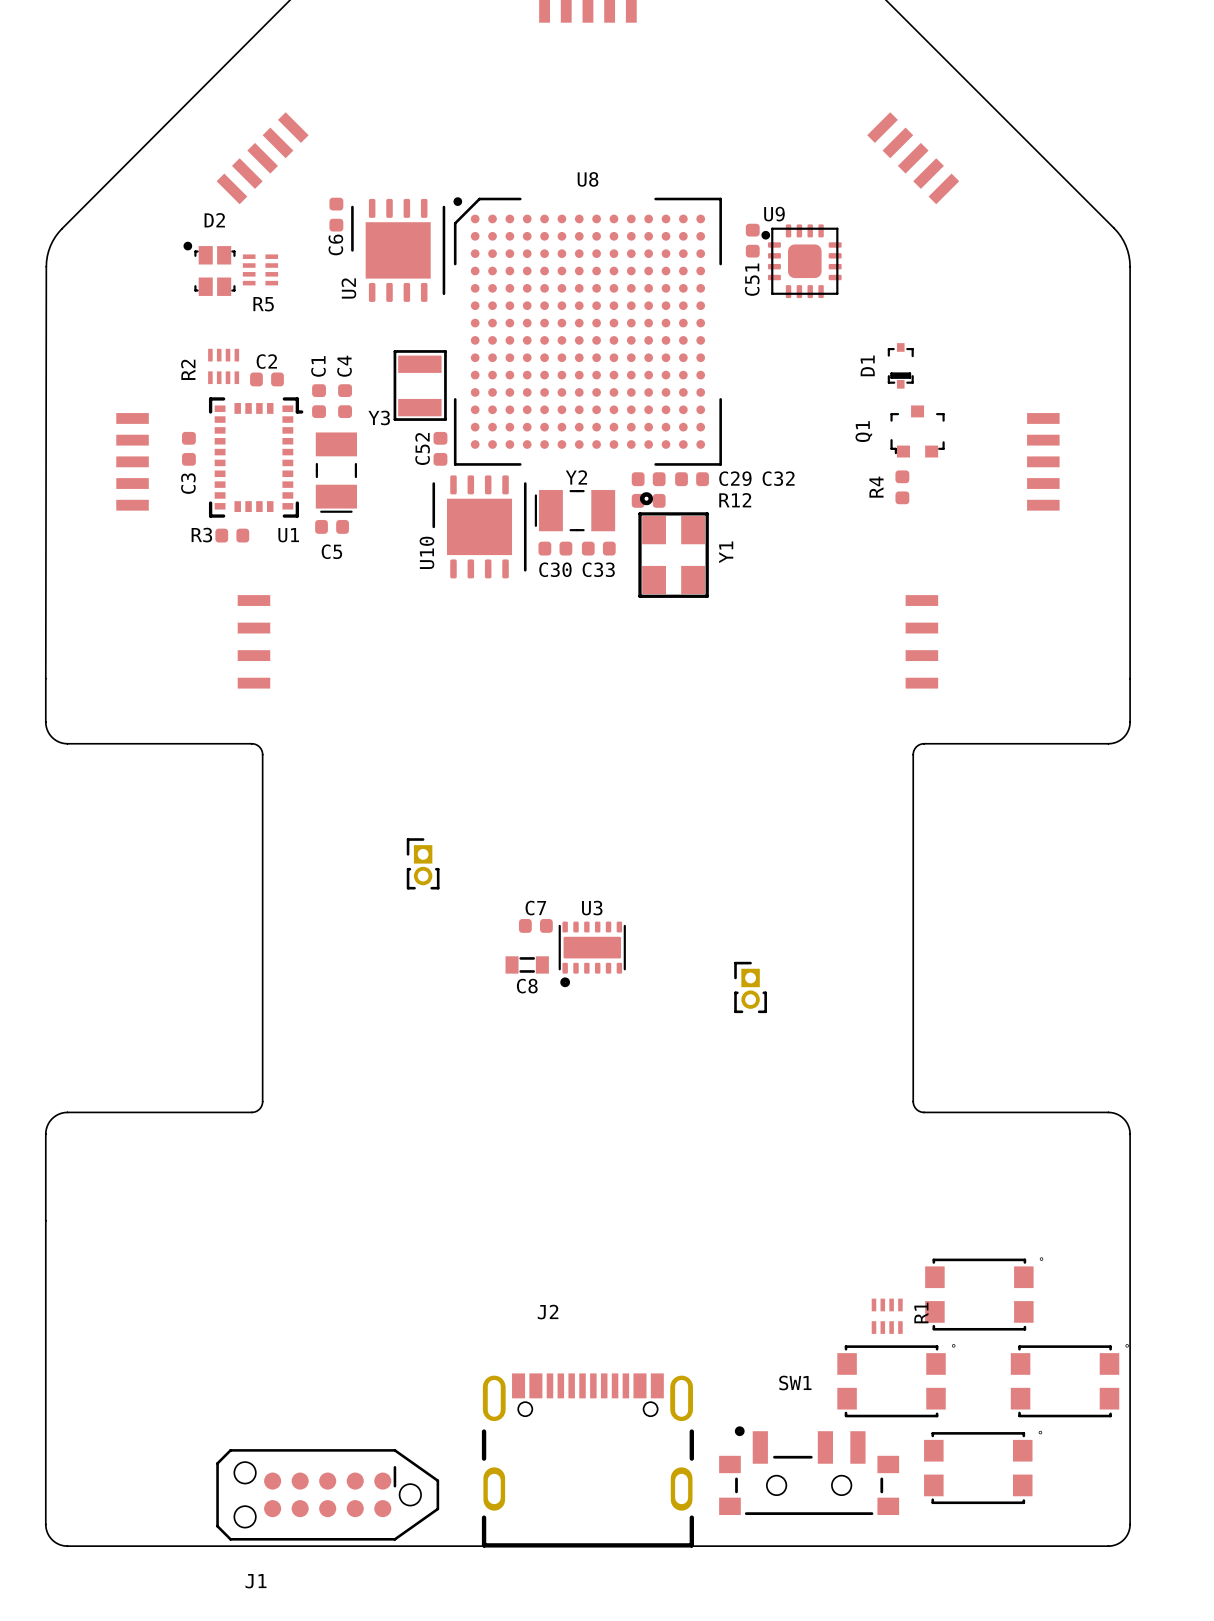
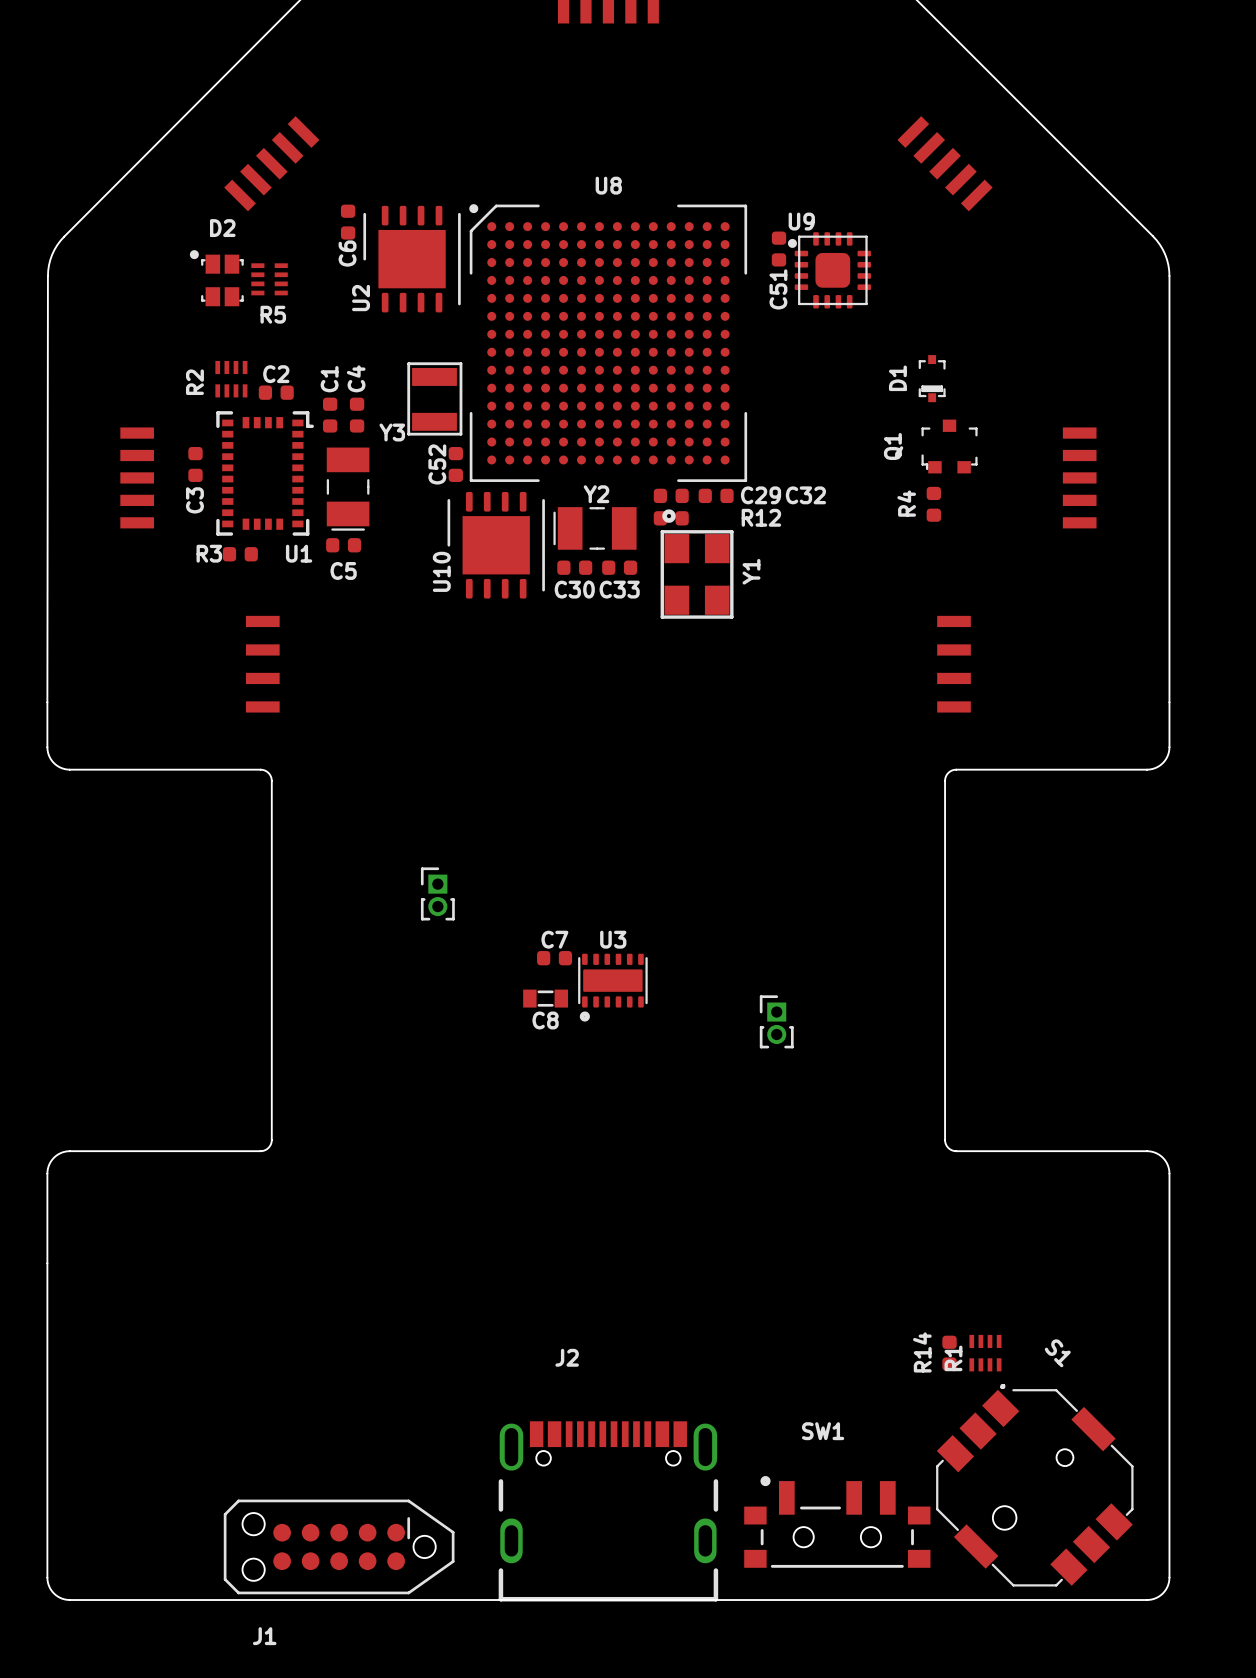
part: (984, 1293) -> none
R14: none -> (949, 1353)
R1 position: (887, 1316) -> (985, 1353)
part: (896, 1380) -> none
part: (1069, 1380) -> none
S1: none -> (1034, 1487)
part: (983, 1467) -> none

